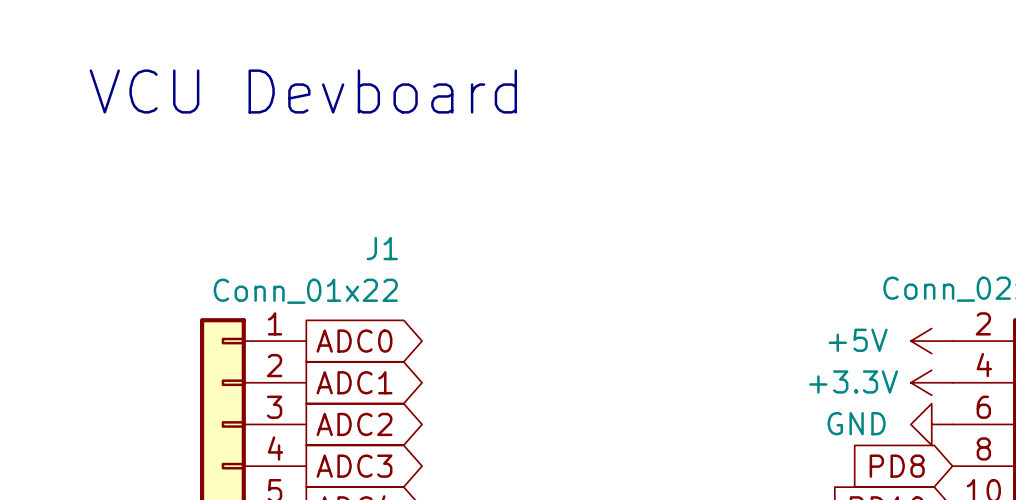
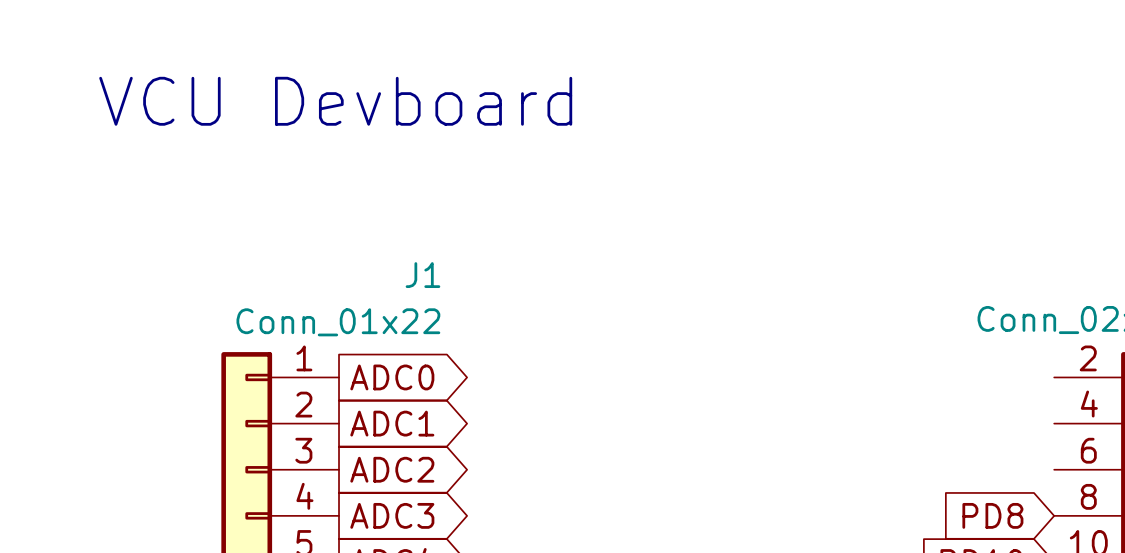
power symbol: +5V (931, 341) -> none
power symbol: +3.3V (931, 382) -> none
power symbol: GND (931, 424) -> none

